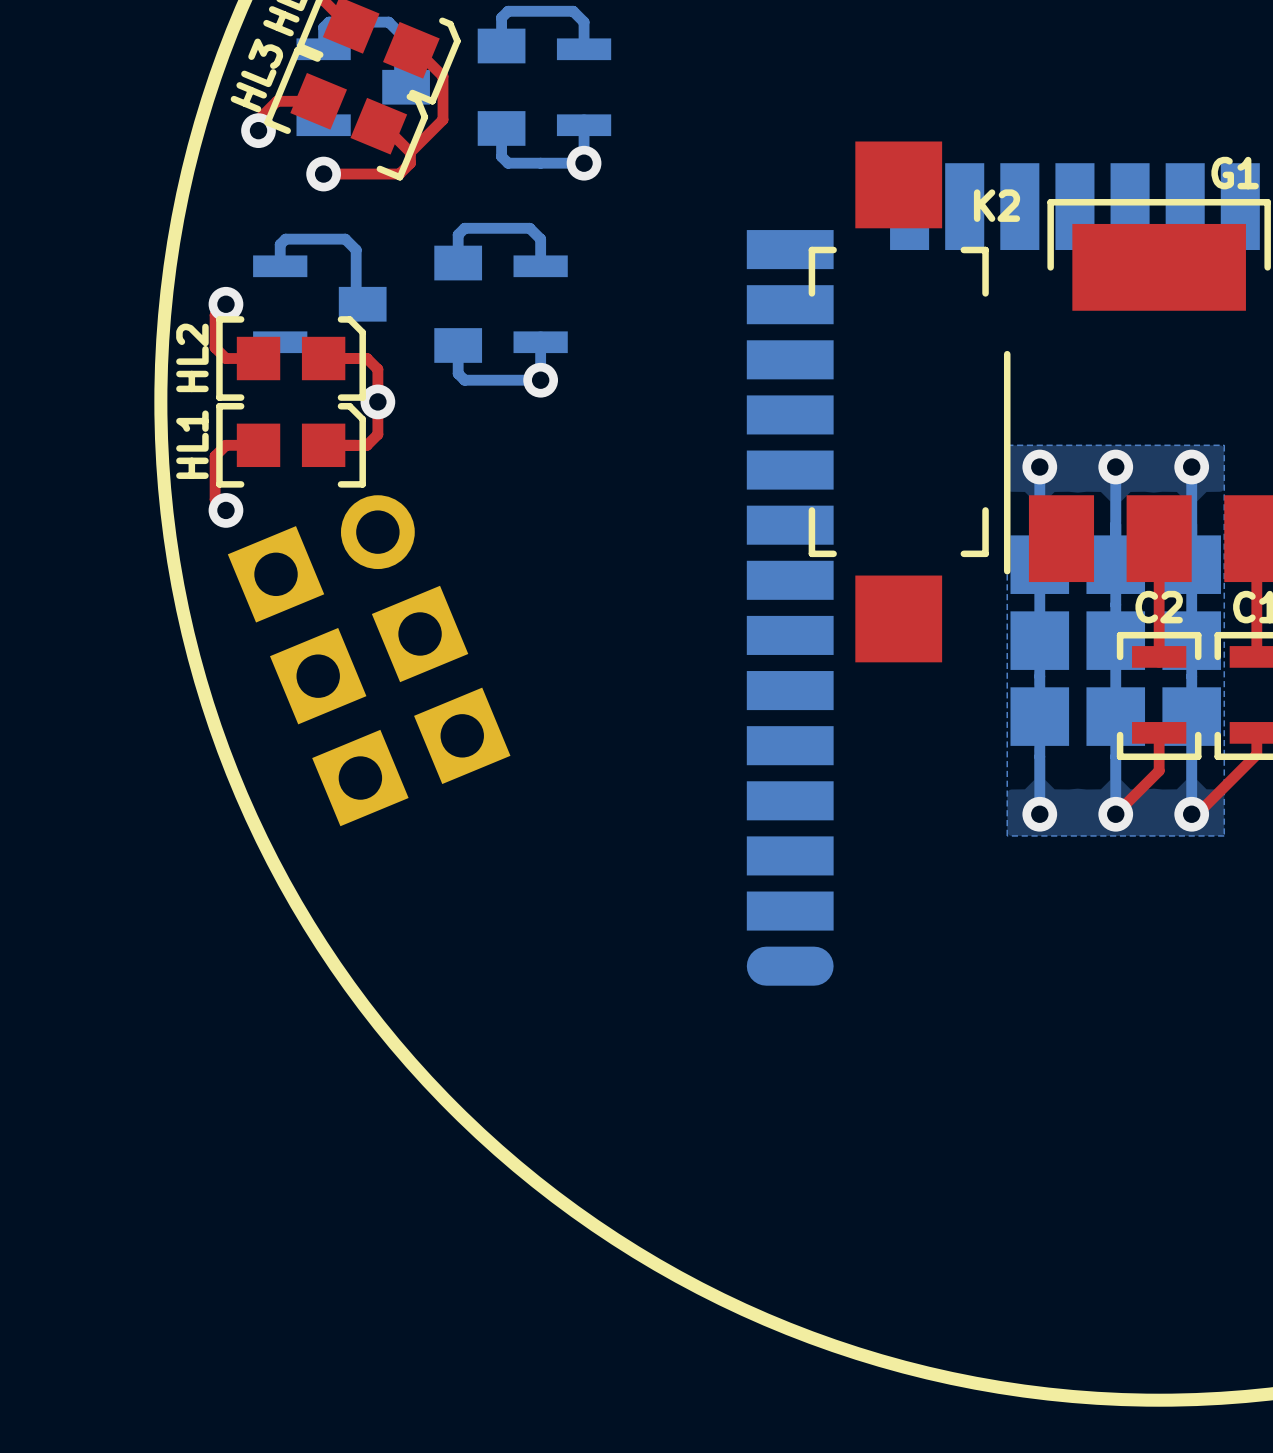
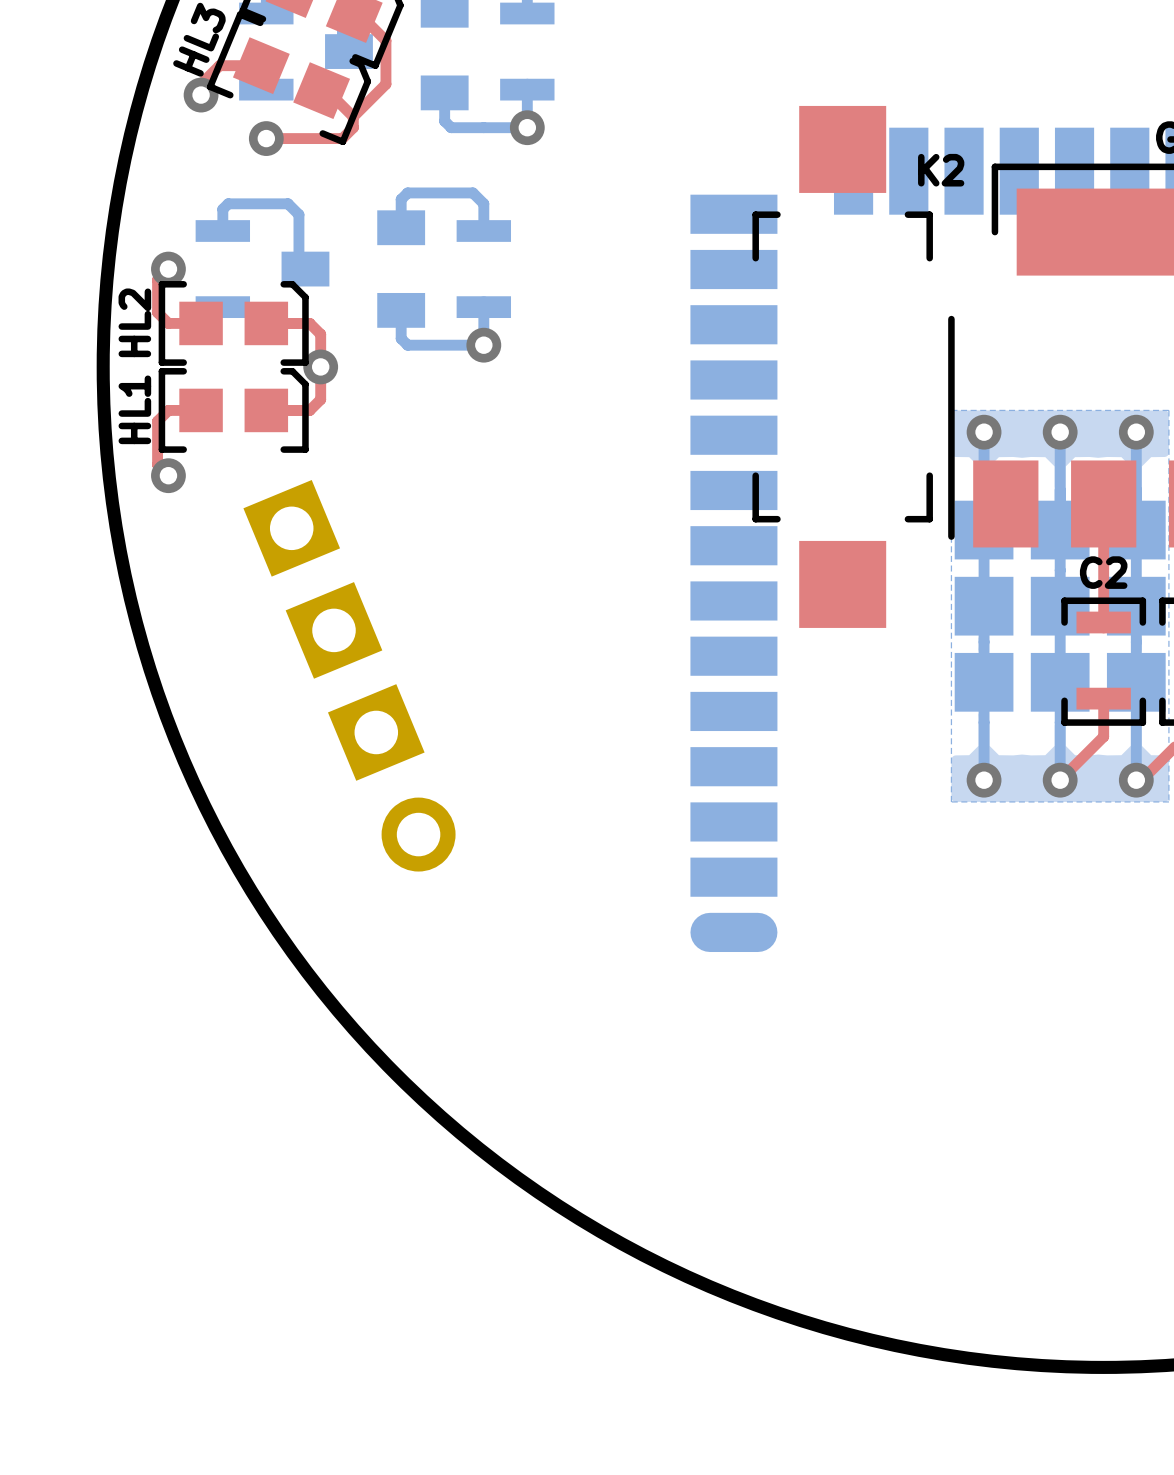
part: (369, 660) -> none
part: none -> (349, 675)

